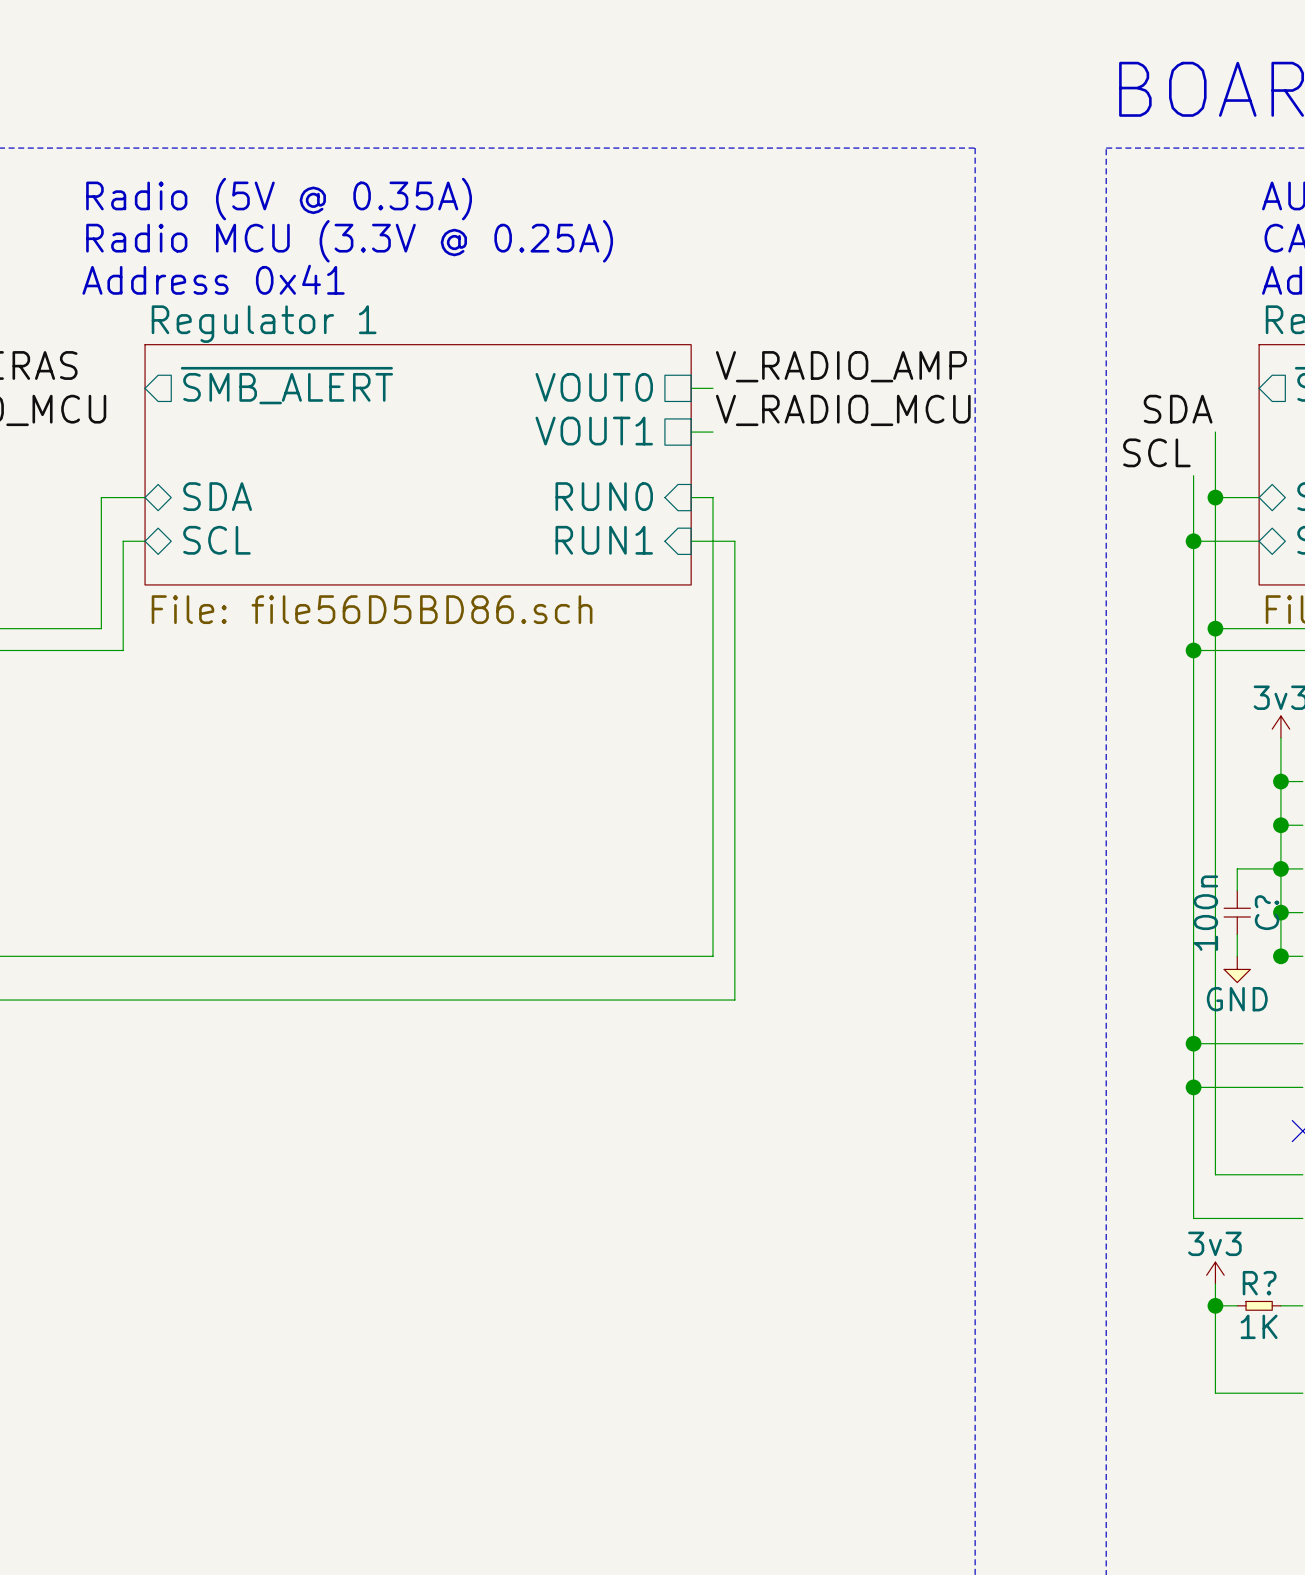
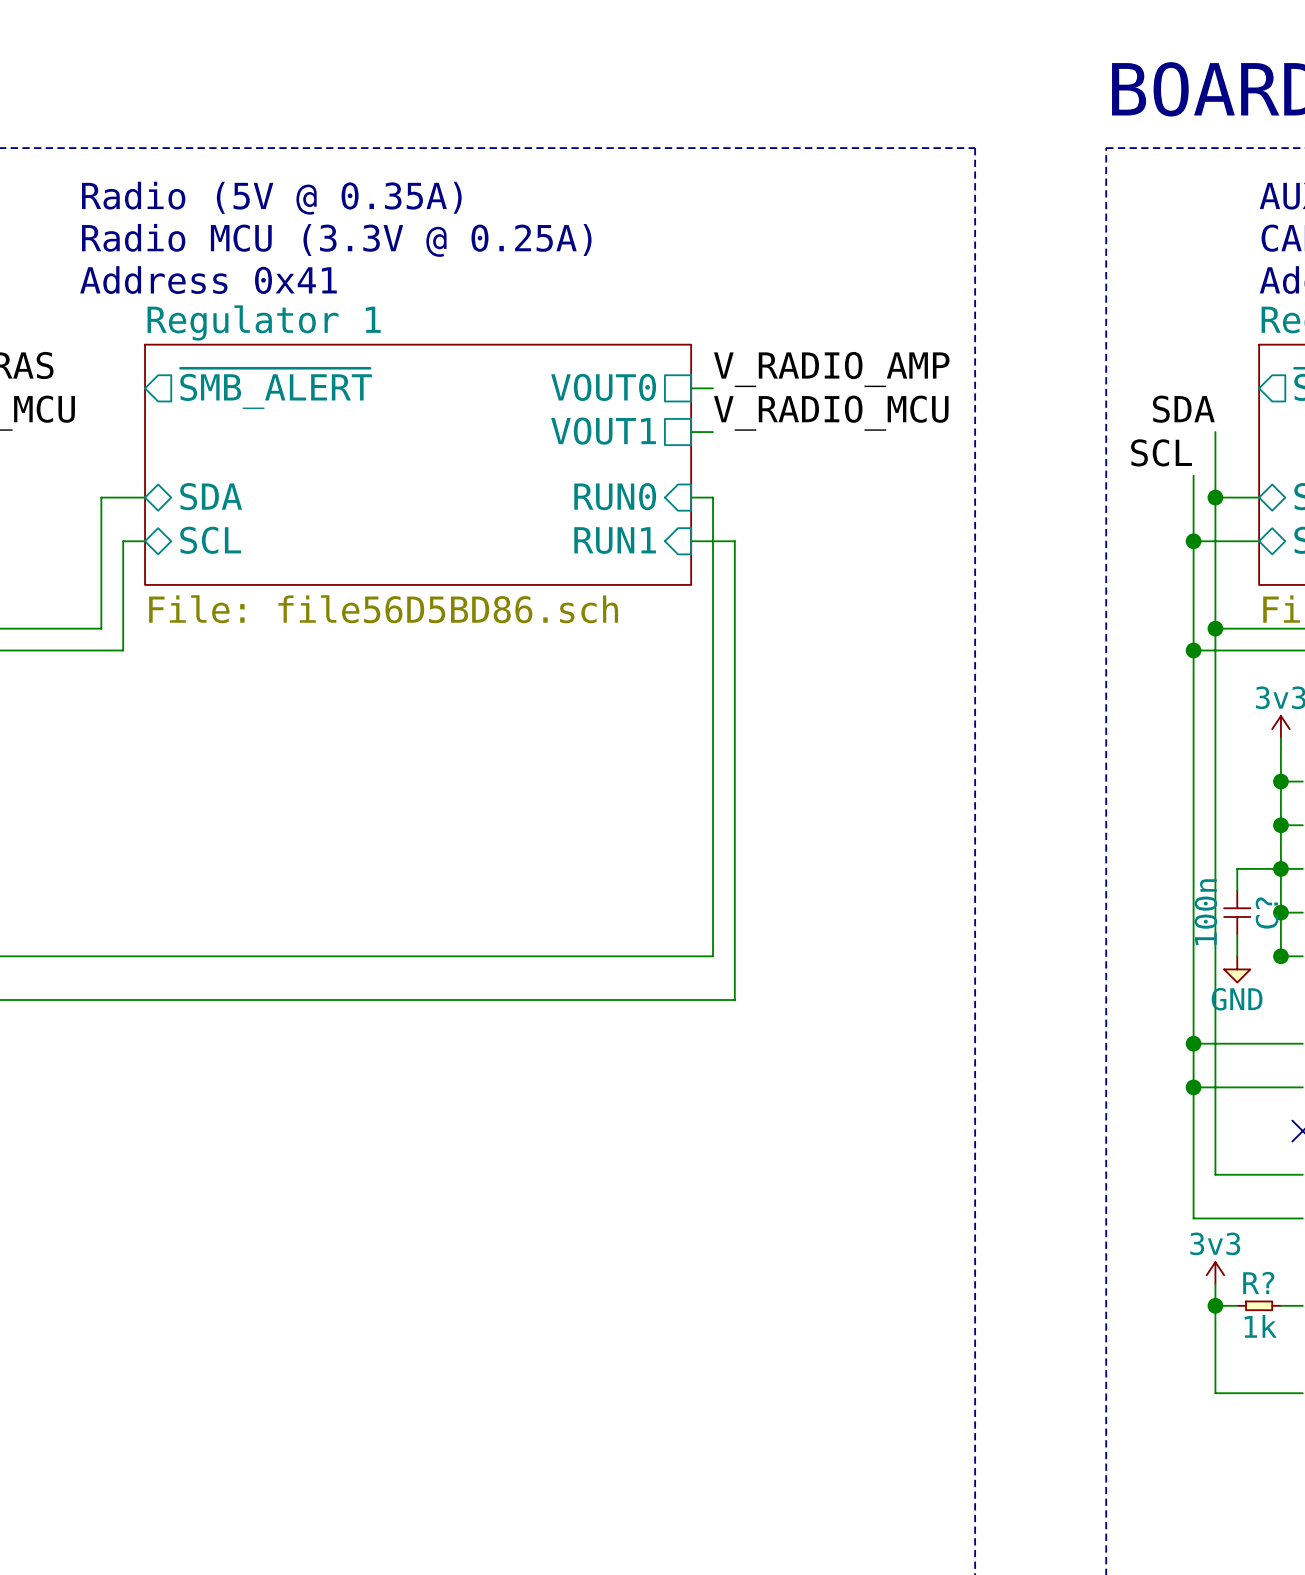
R? value: 1K (1259, 1326) -> 1k (1260, 1326)

